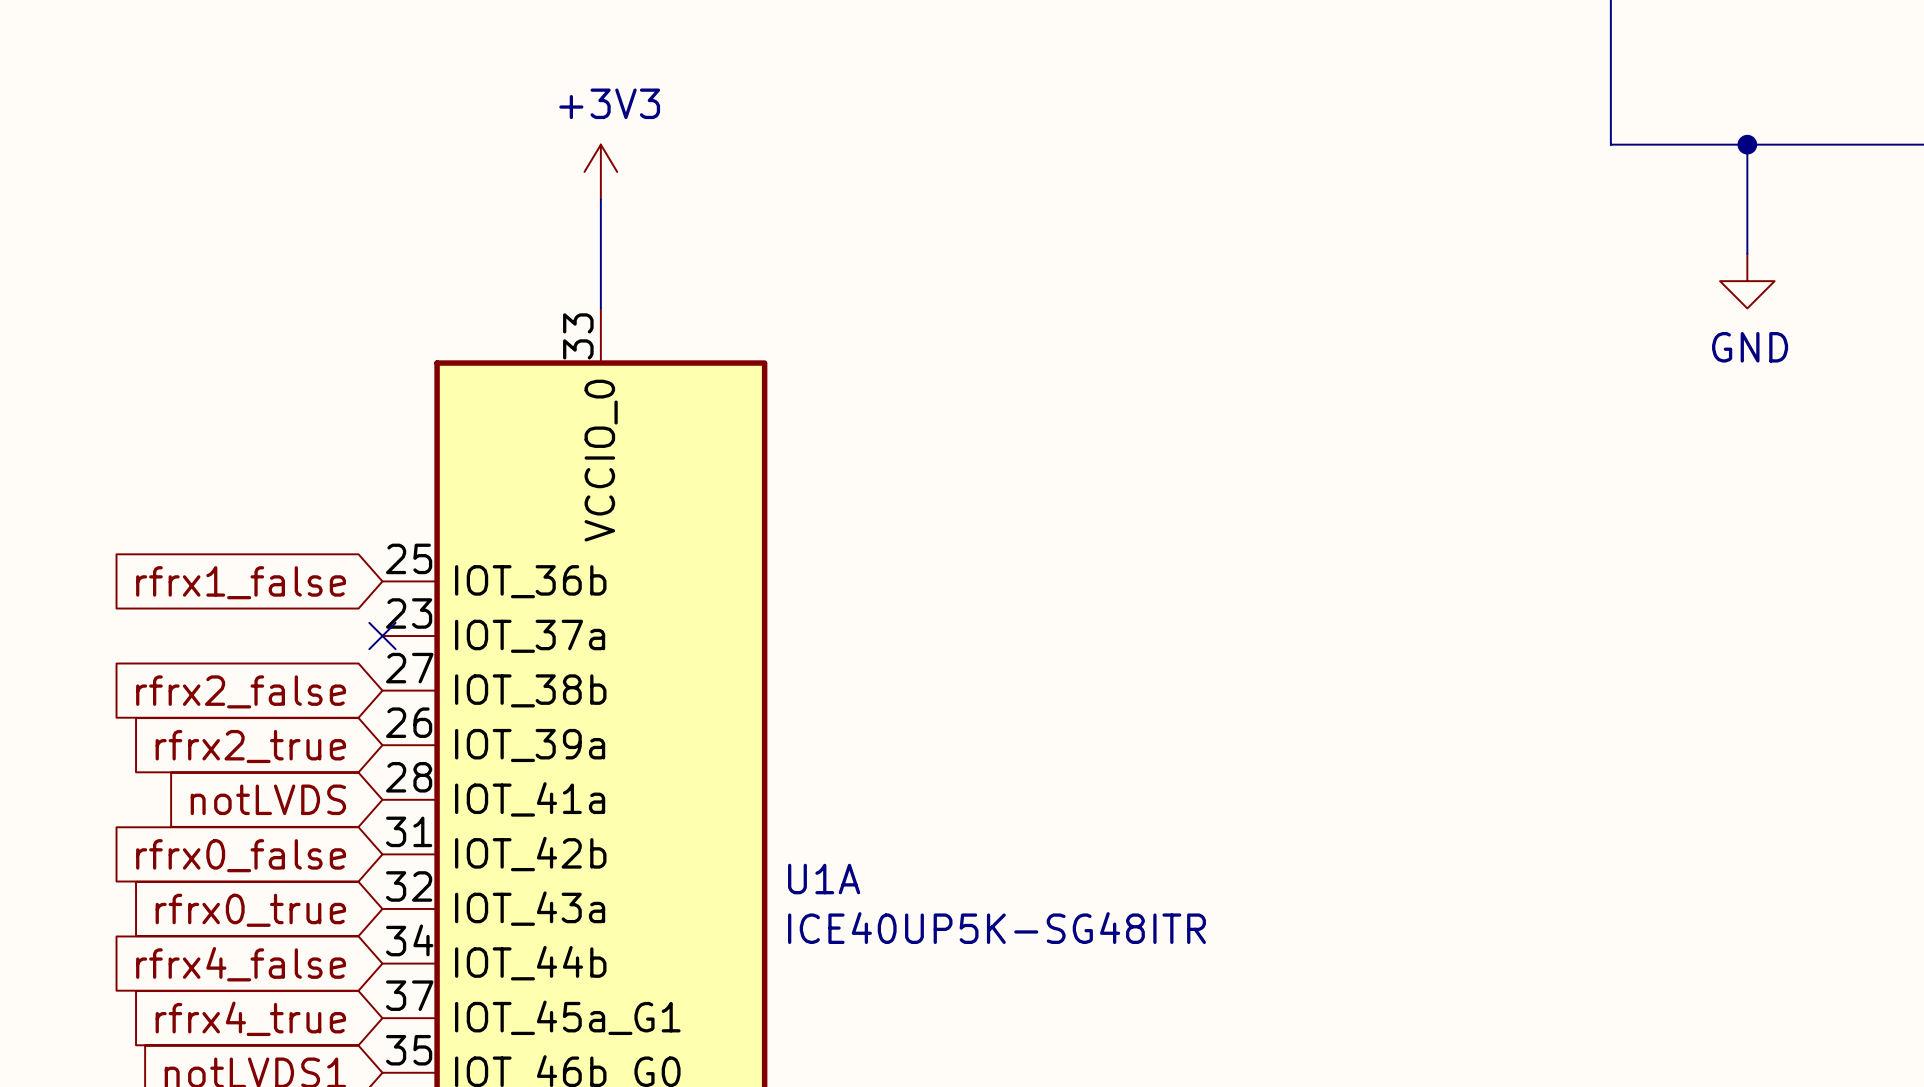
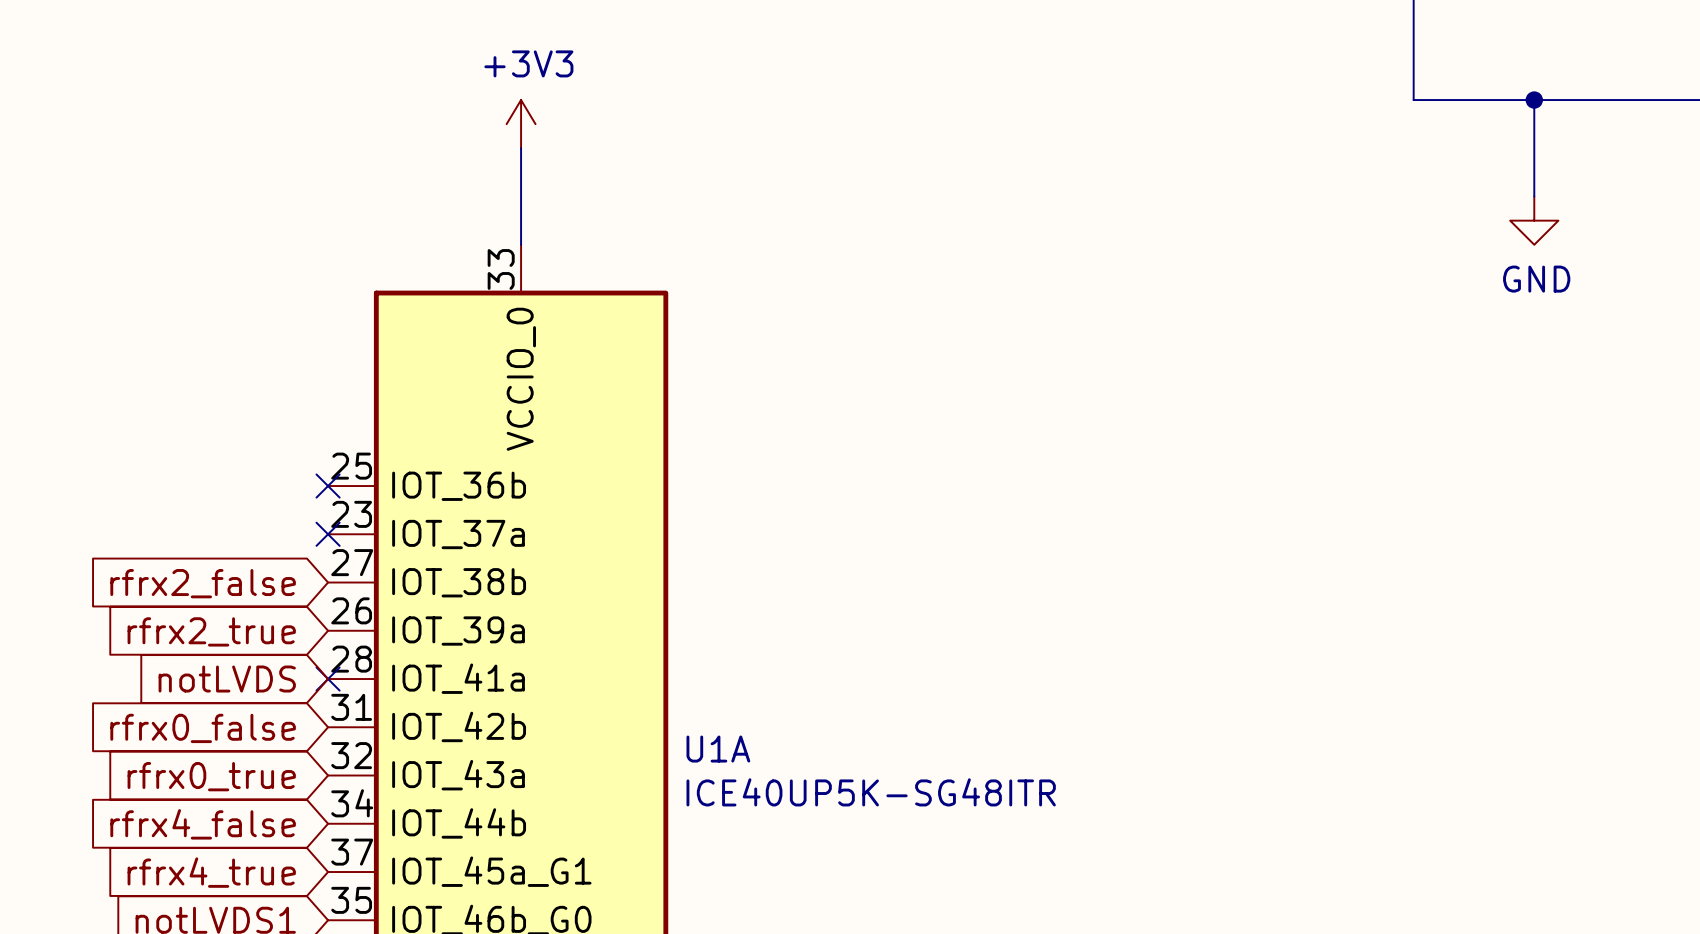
no-connect mark: none -> (328, 486)
global label: rfrx1_false (241, 582) -> none
no-connect mark: none -> (328, 679)

